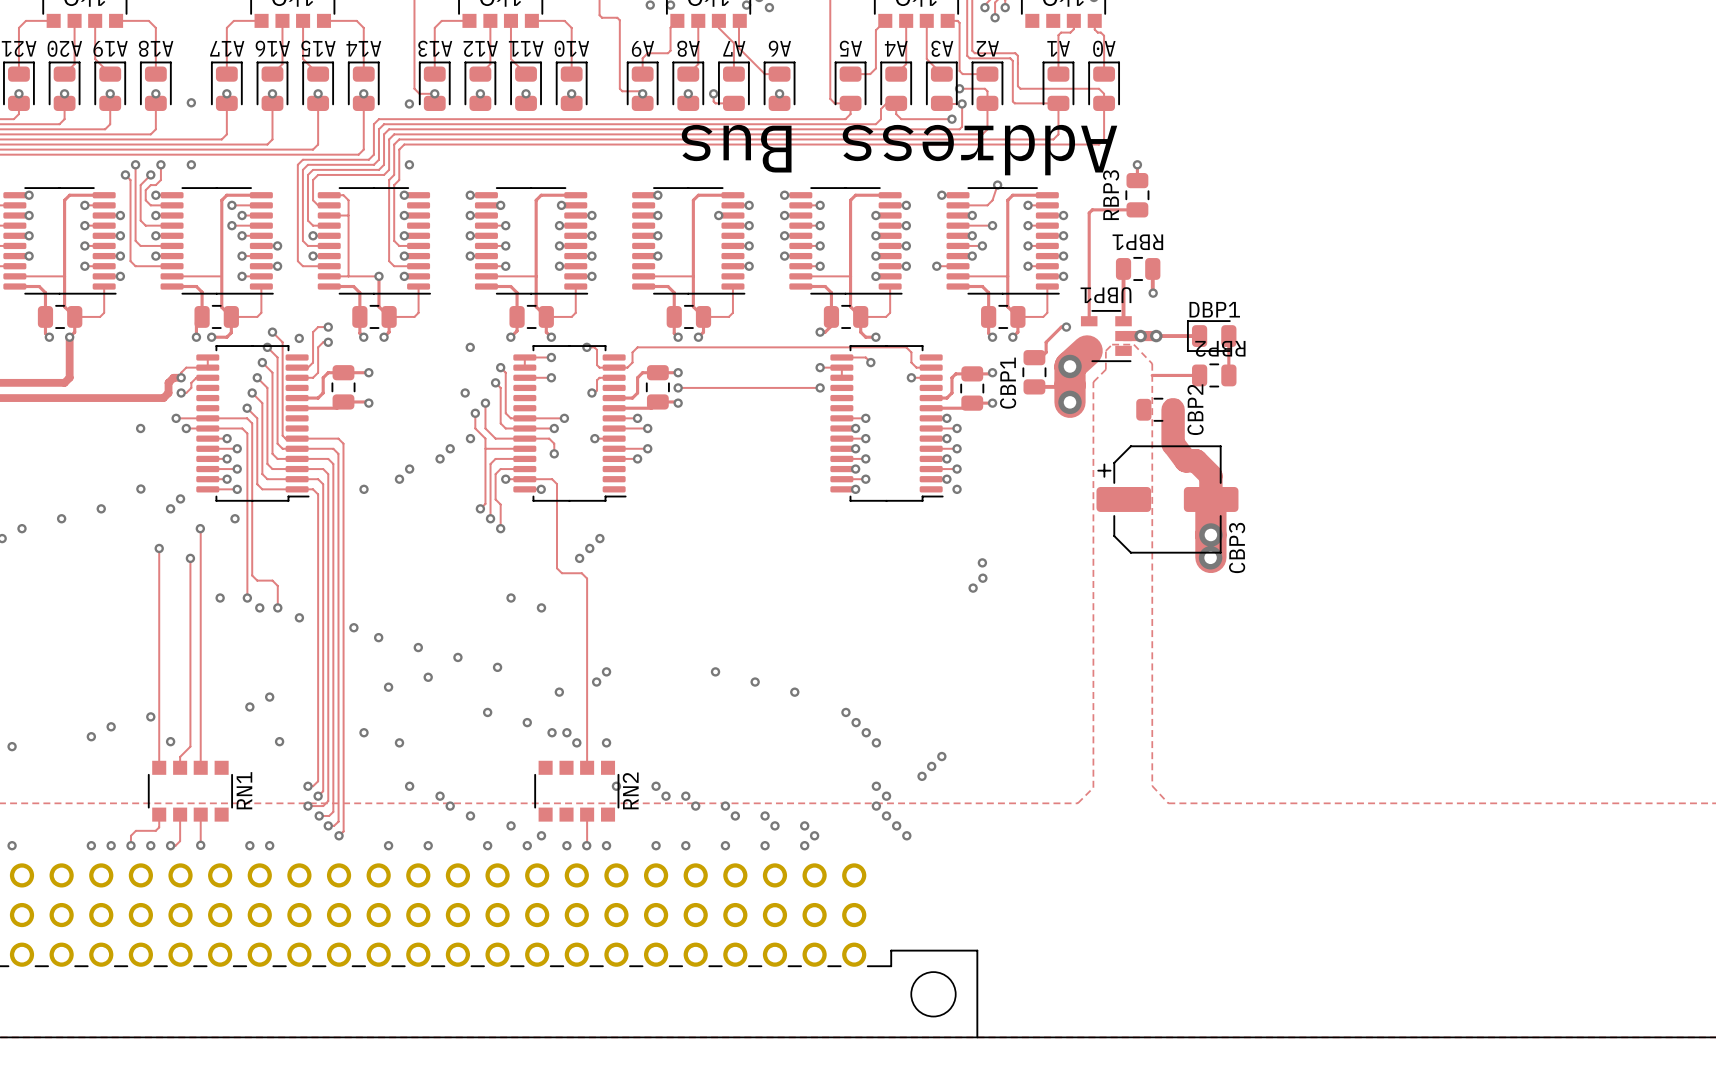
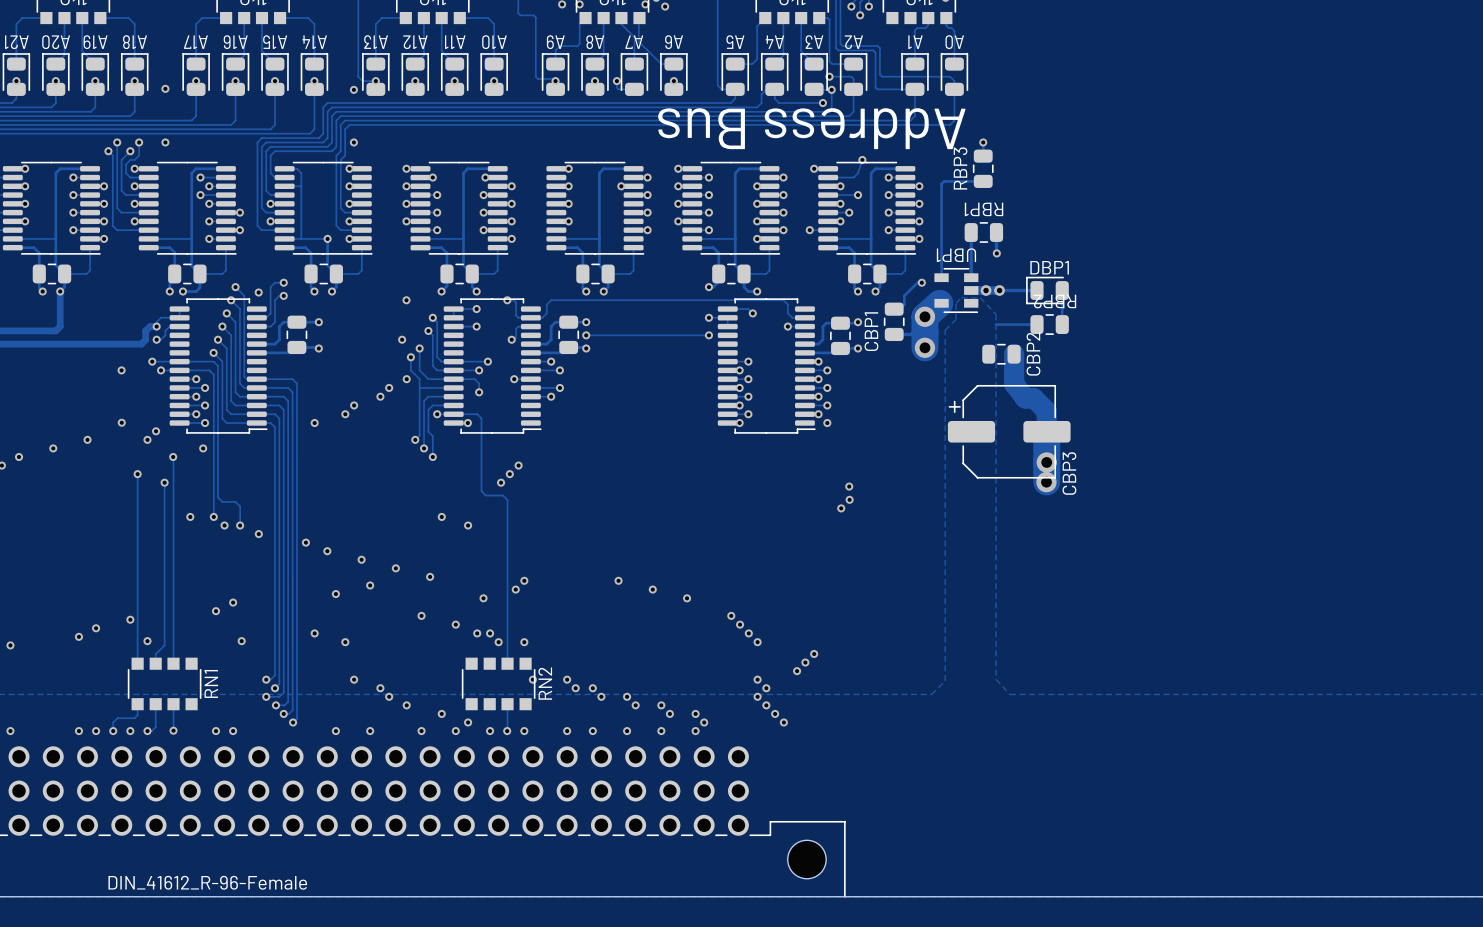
part value: none -> DIN_41612_R-96-Female (207, 882)

